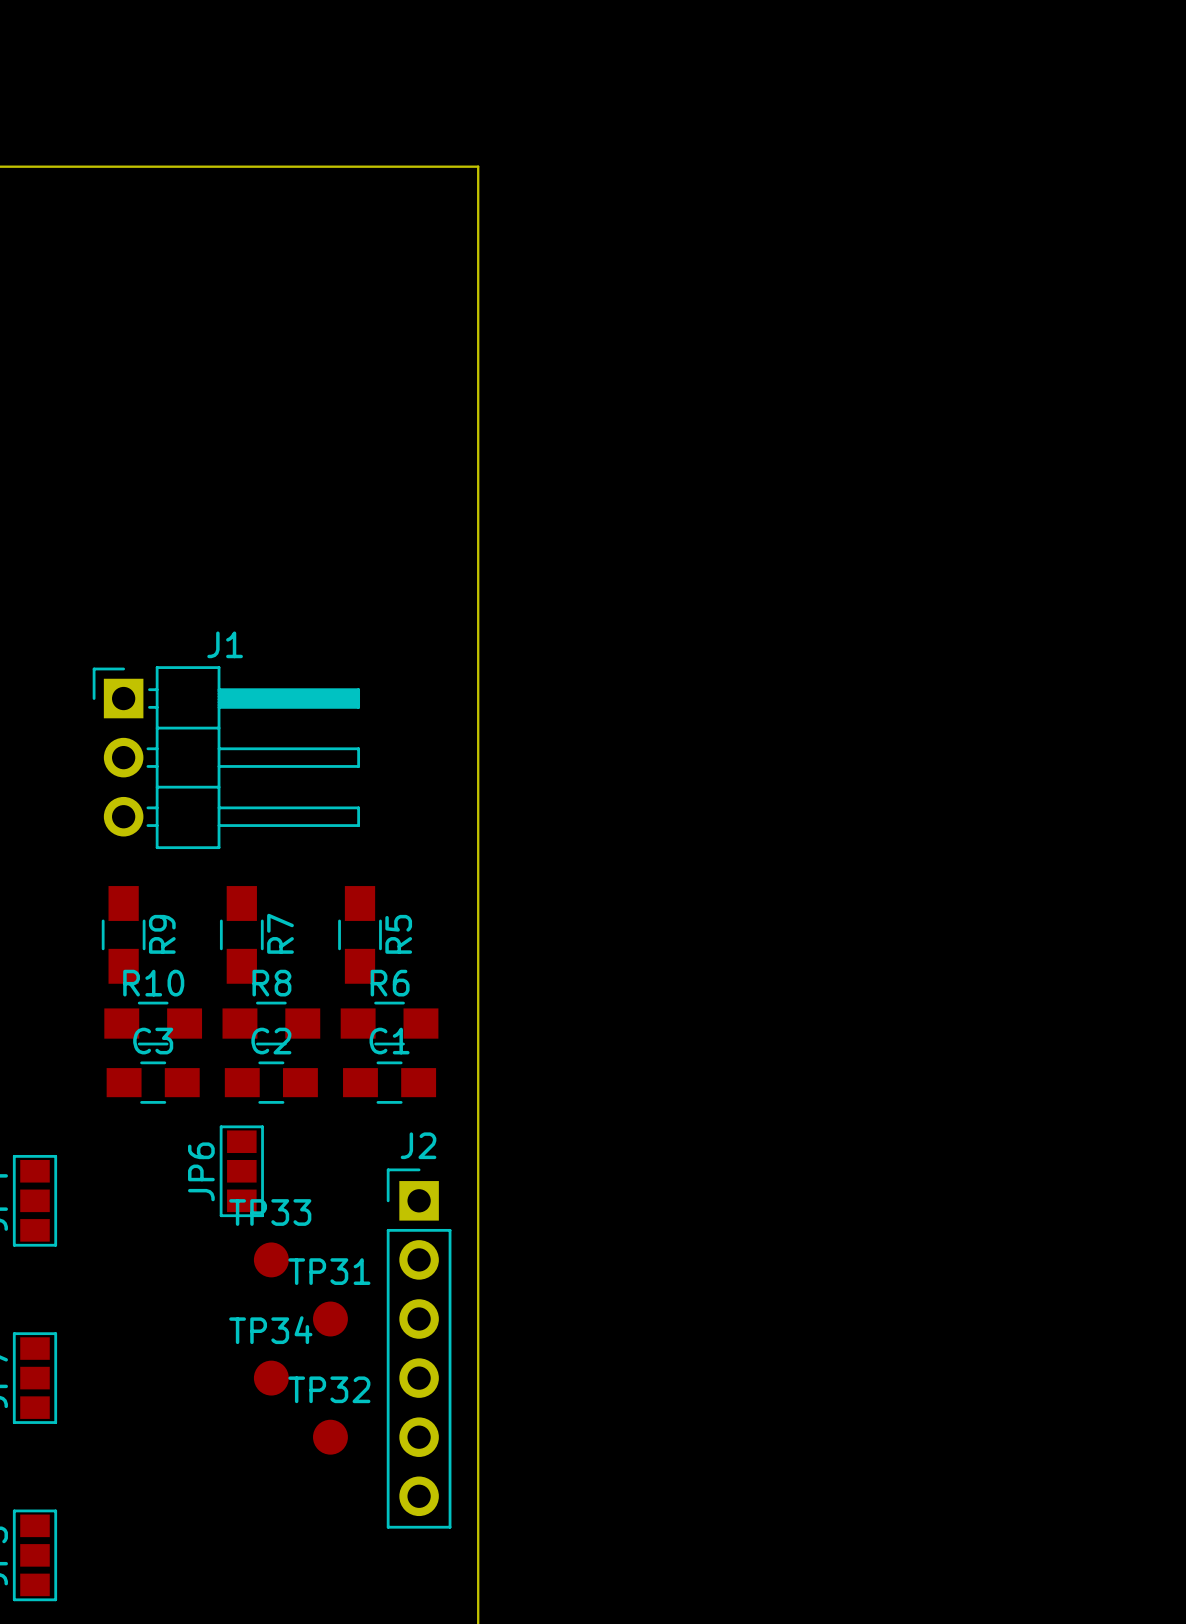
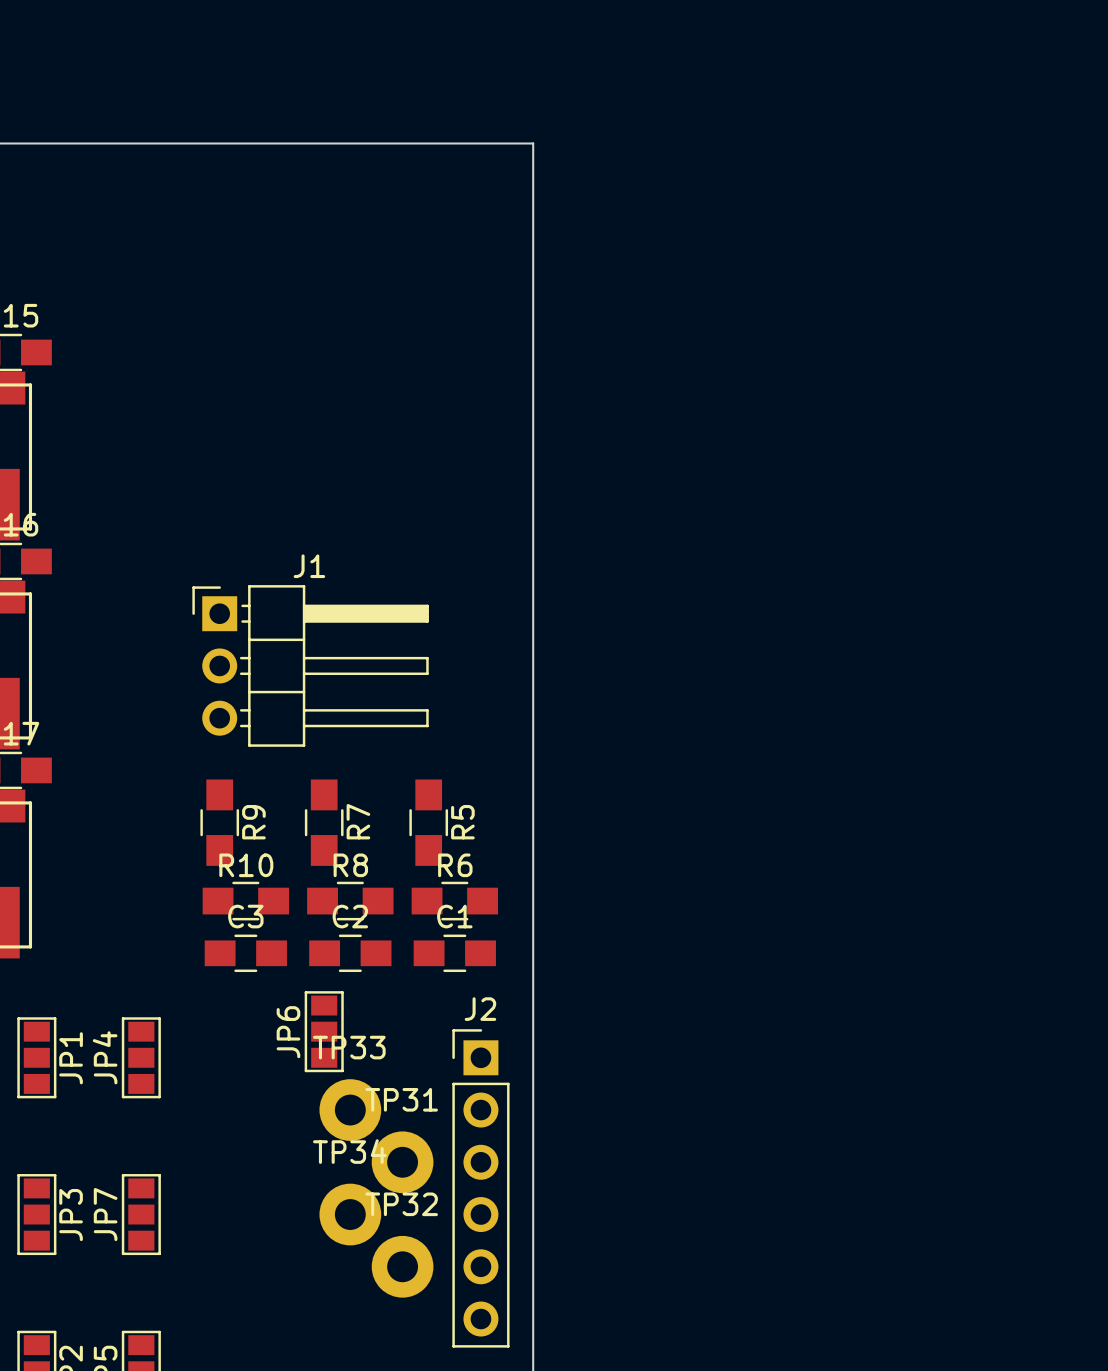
TP33 footprint: [253, 1242, 289, 1278] -> [319, 1079, 382, 1141]
TP31 footprint: [313, 1301, 348, 1337] -> [371, 1131, 434, 1194]
TP34 footprint: [253, 1360, 289, 1396] -> [319, 1183, 382, 1246]
TP32 footprint: [313, 1419, 348, 1455] -> [371, 1235, 434, 1298]

